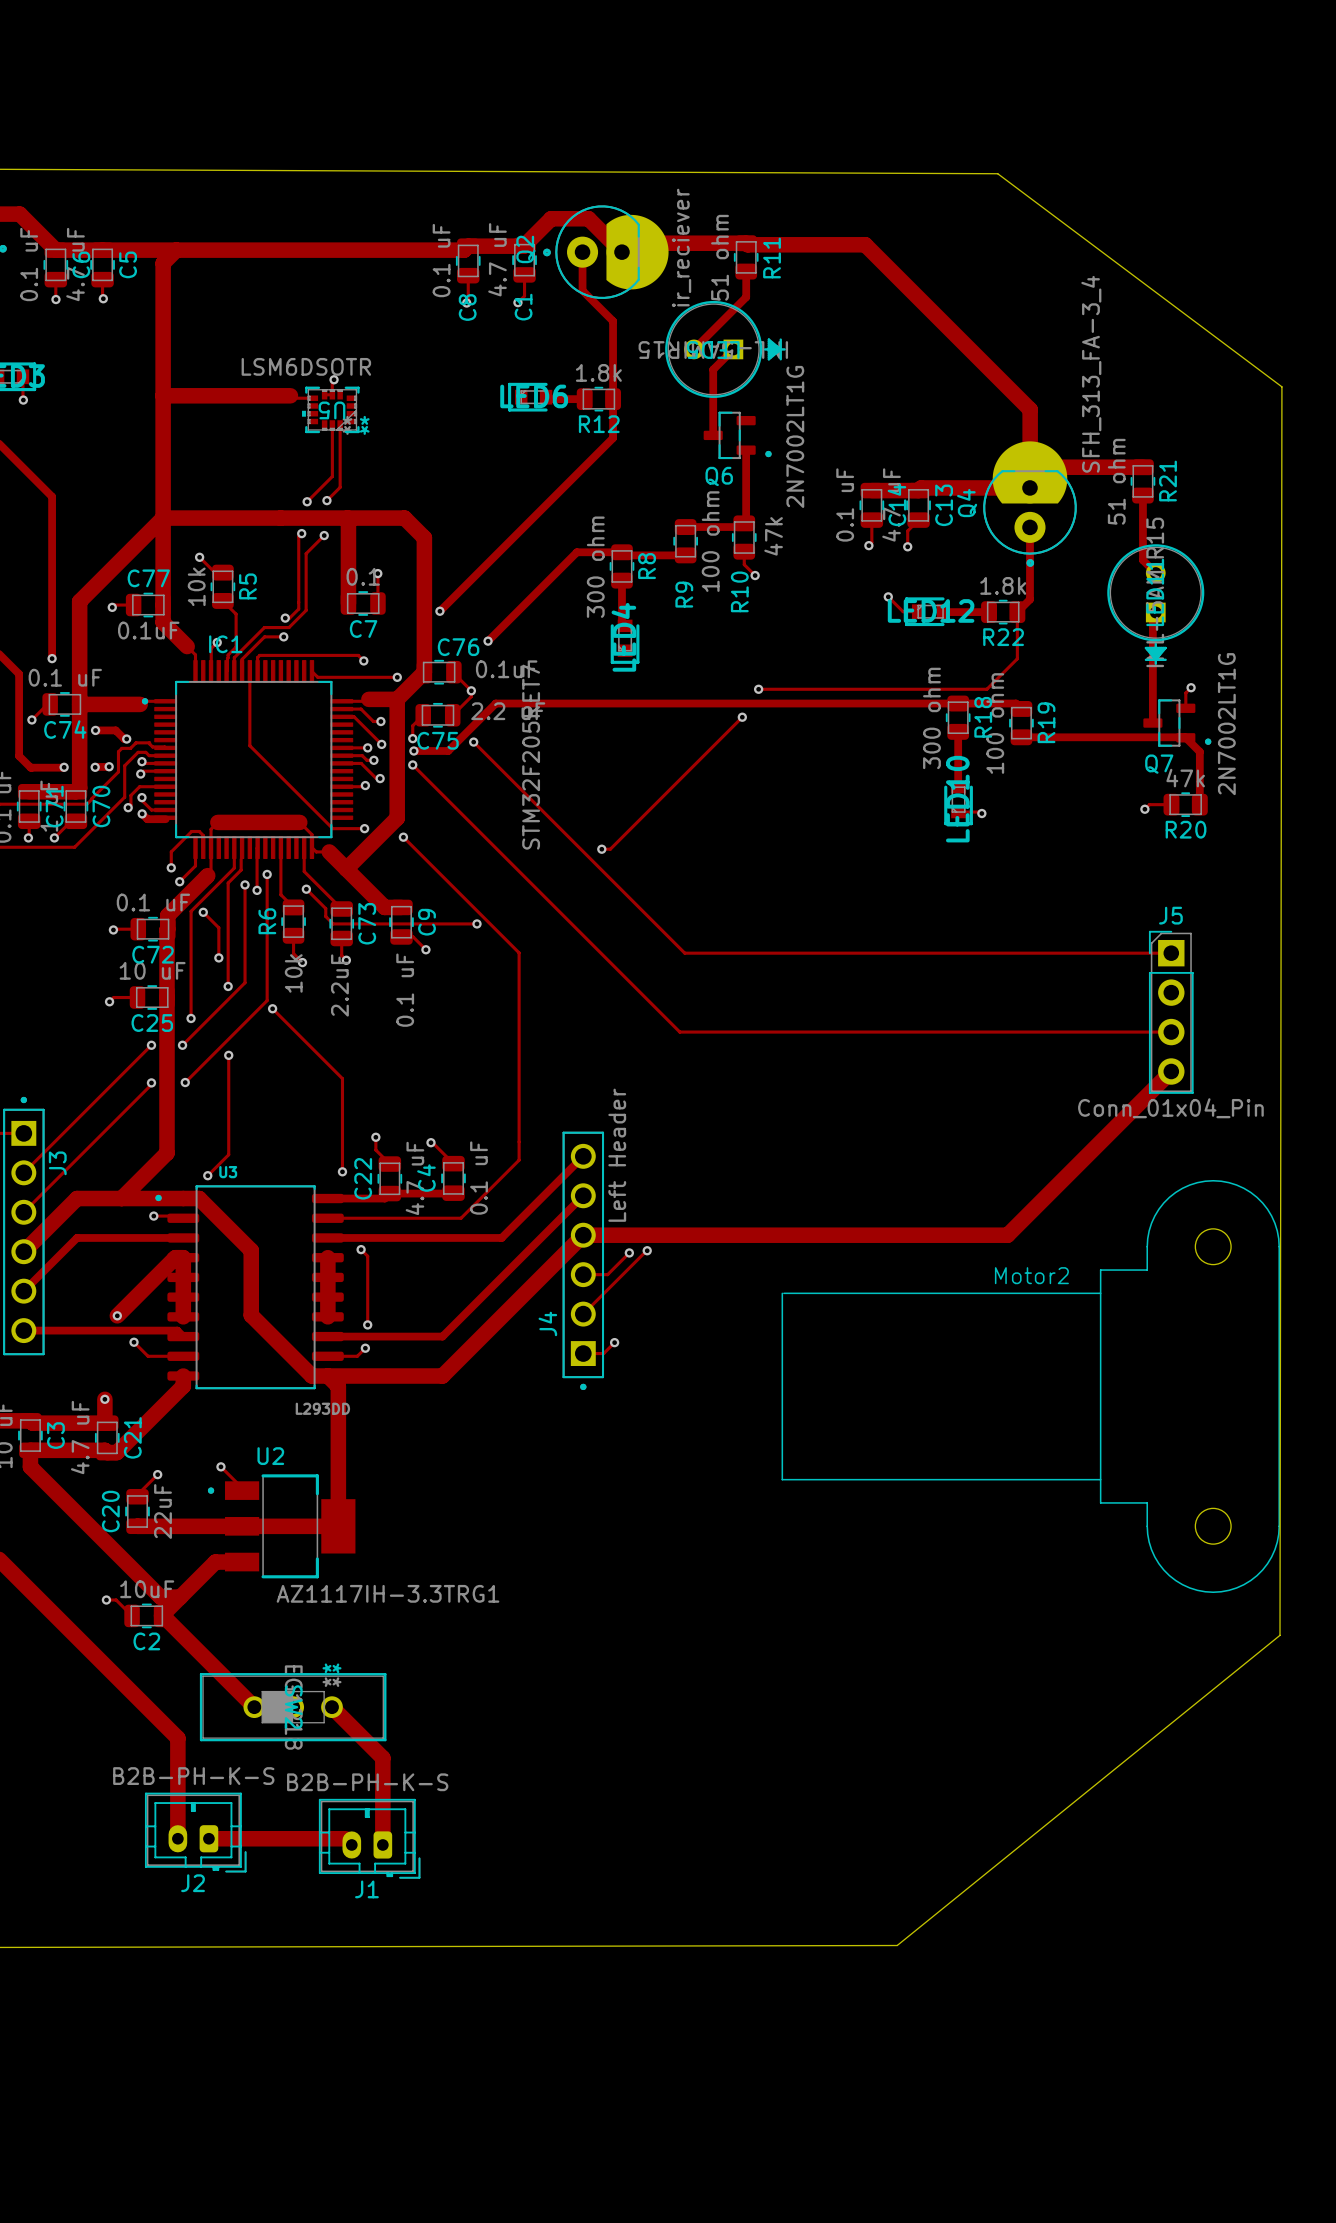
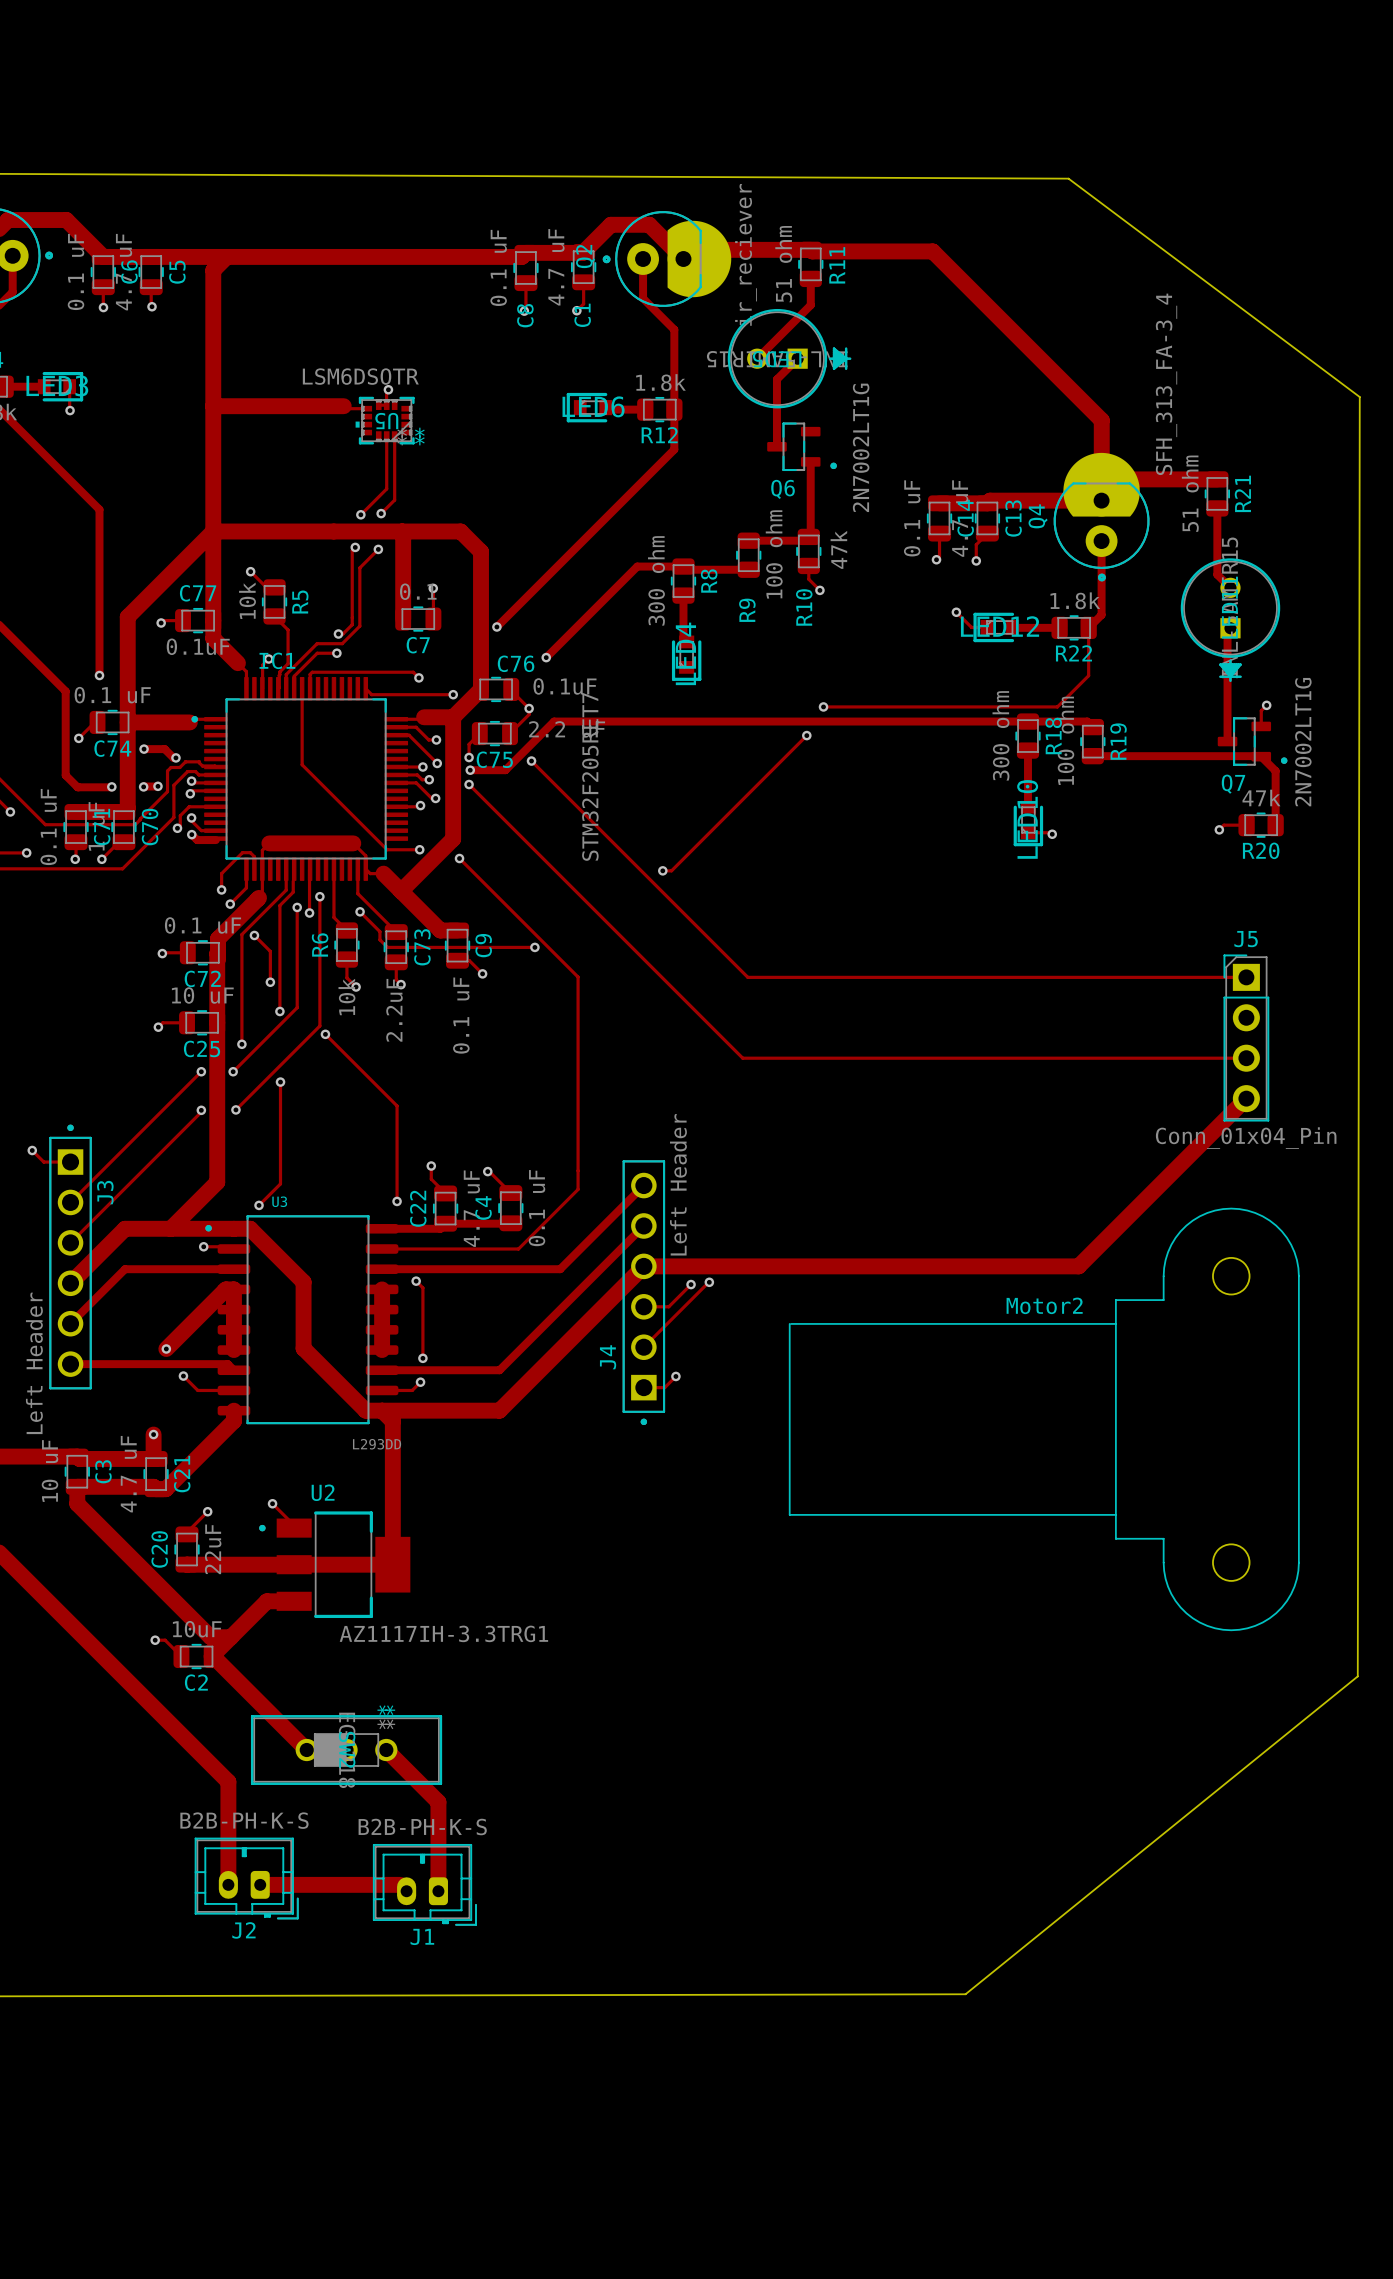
Motor2 position: (1030, 1386) -> (1044, 1419)

